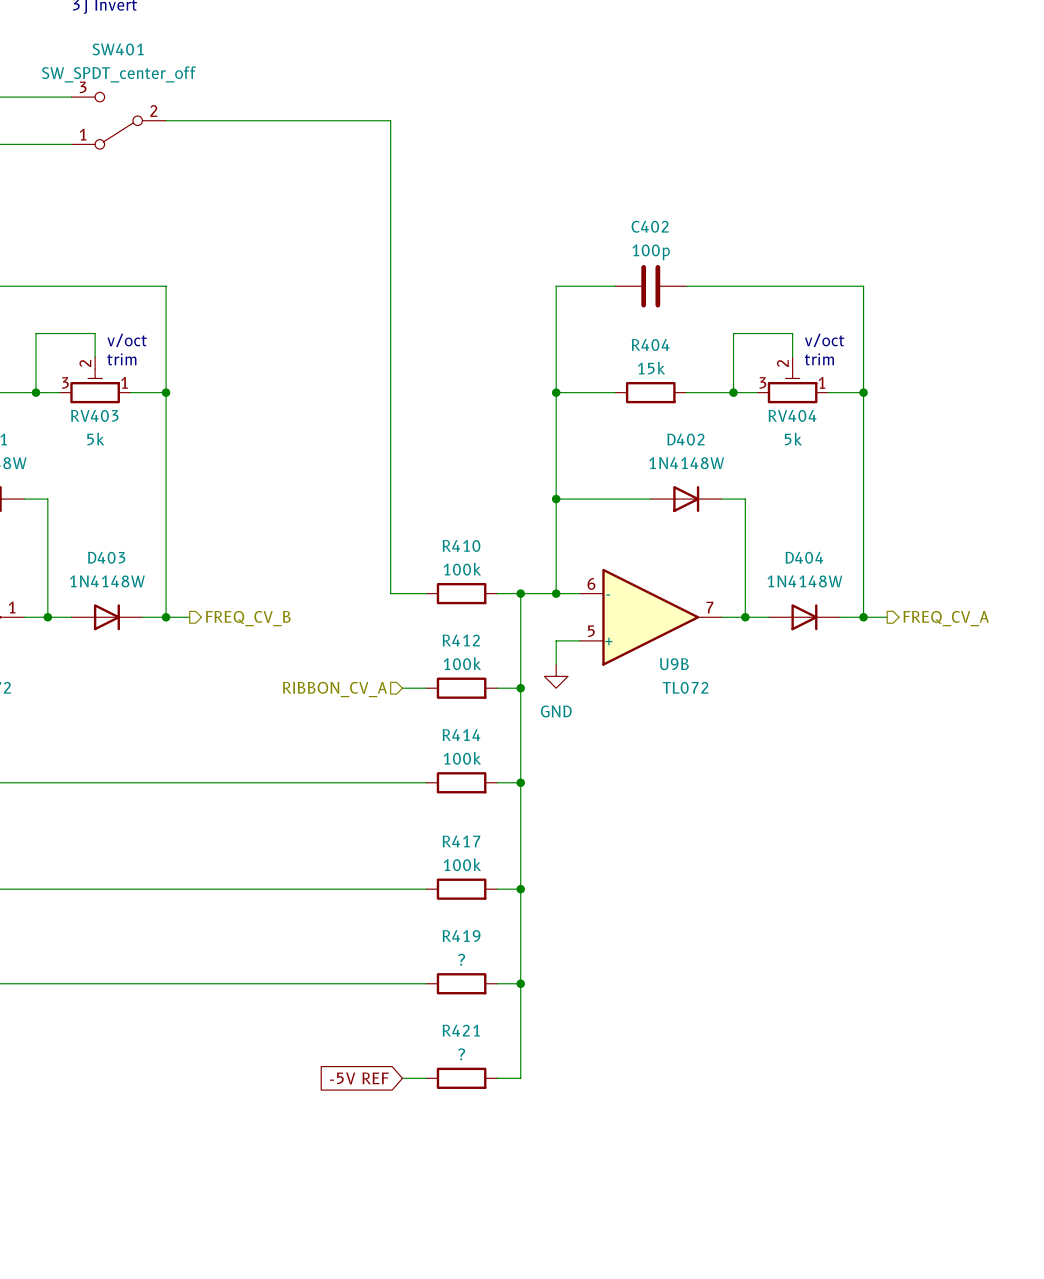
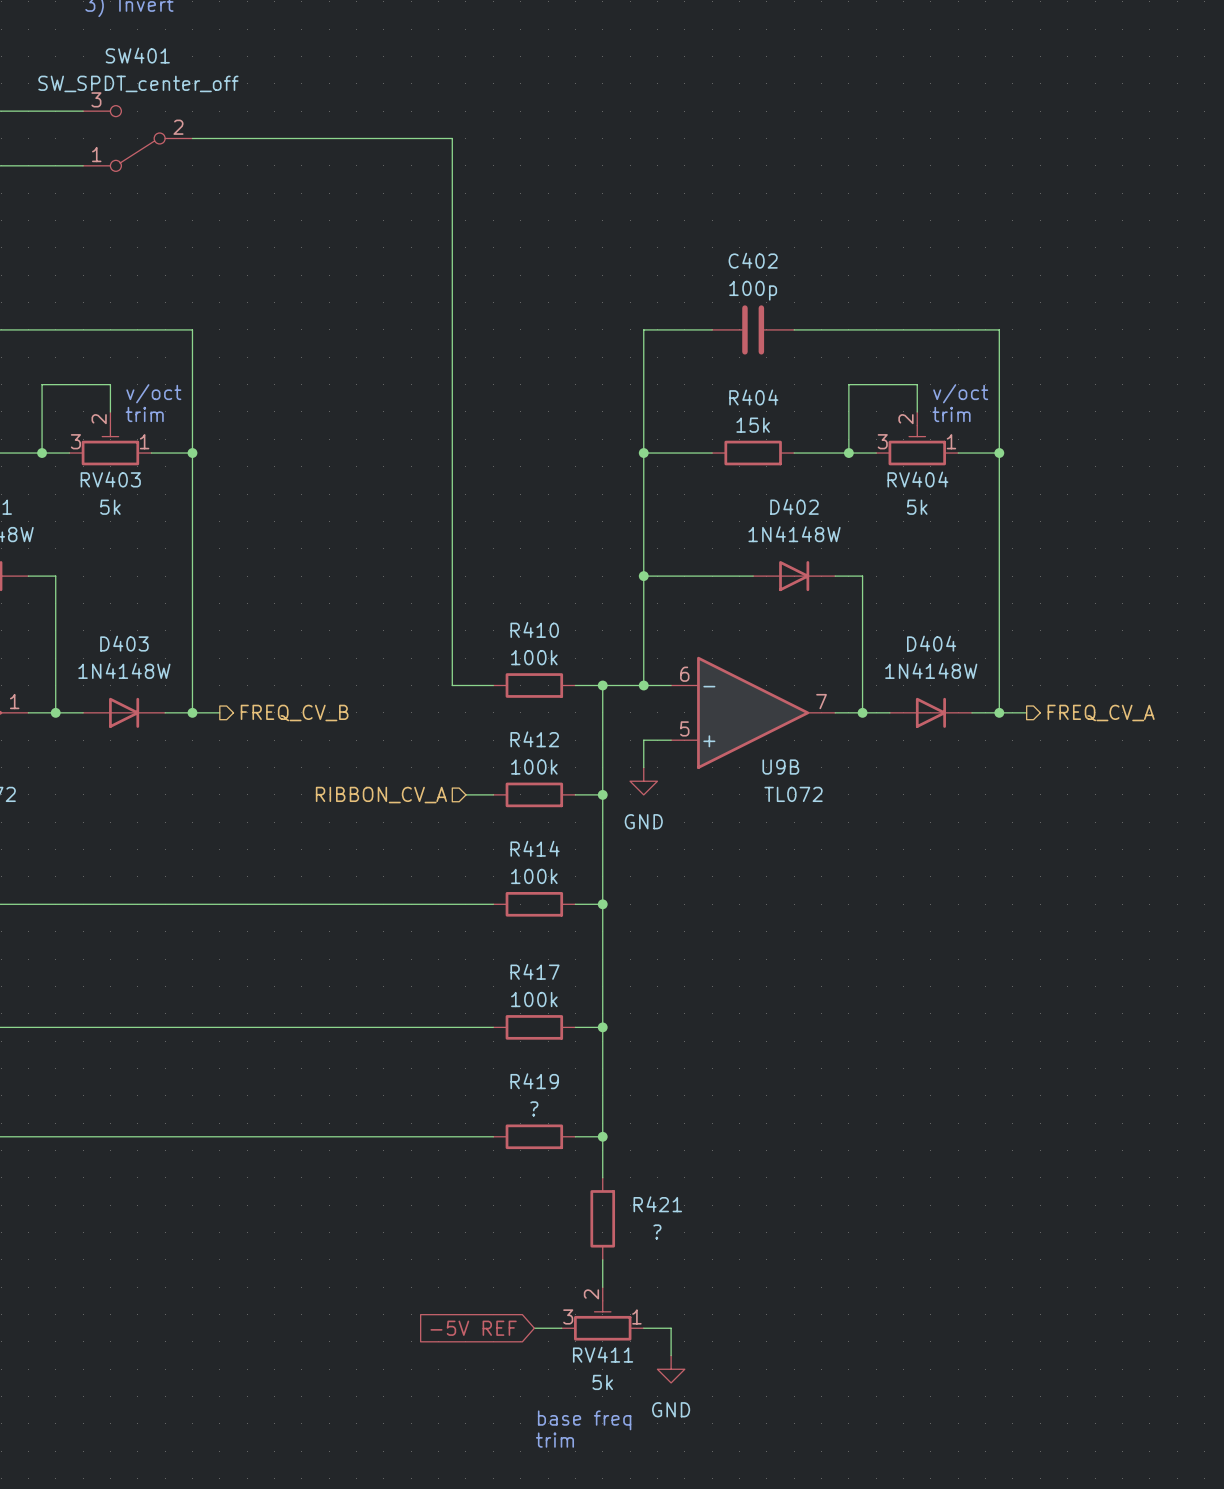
wire: (520, 1019) (520, 1078) (497, 1078) -> none
R421 value position: ? (461, 1054) -> ? (657, 1232)
global label position: -5V REF (359, 1078) -> -5V REF (473, 1328)
wire: (402, 1078) (426, 1078) -> (534, 1328) (561, 1328)
R421 rotation: 0° (461, 1078) -> 90° clockwise (602, 1218)
R421 position: (461, 1078) -> (602, 1218)
wire: none -> (602, 1259) (602, 1287)
RV411: none -> 5k (602, 1313)
wire: none -> (643, 1328) (671, 1328) (671, 1355)
power symbol: none -> GND (671, 1369)
text: none -> base freq (584, 1420)
text: none -> trim (554, 1440)

